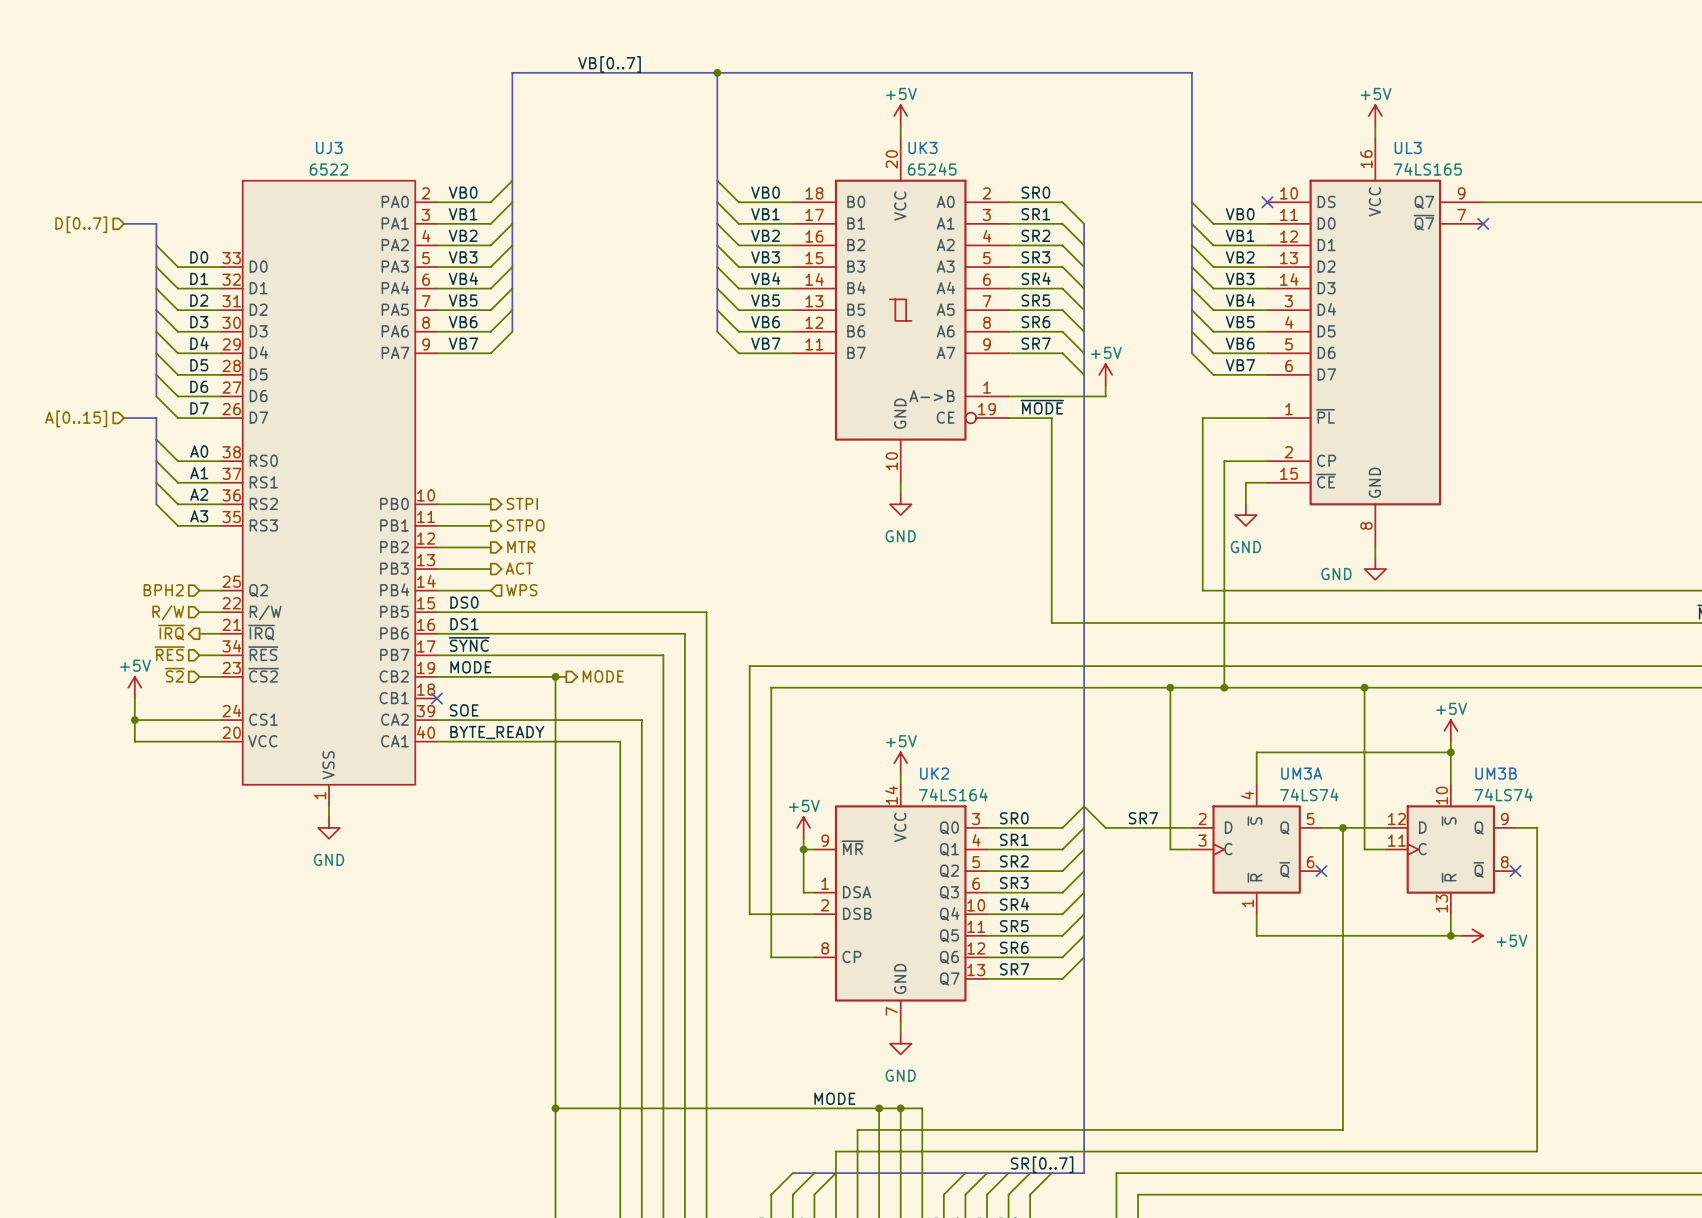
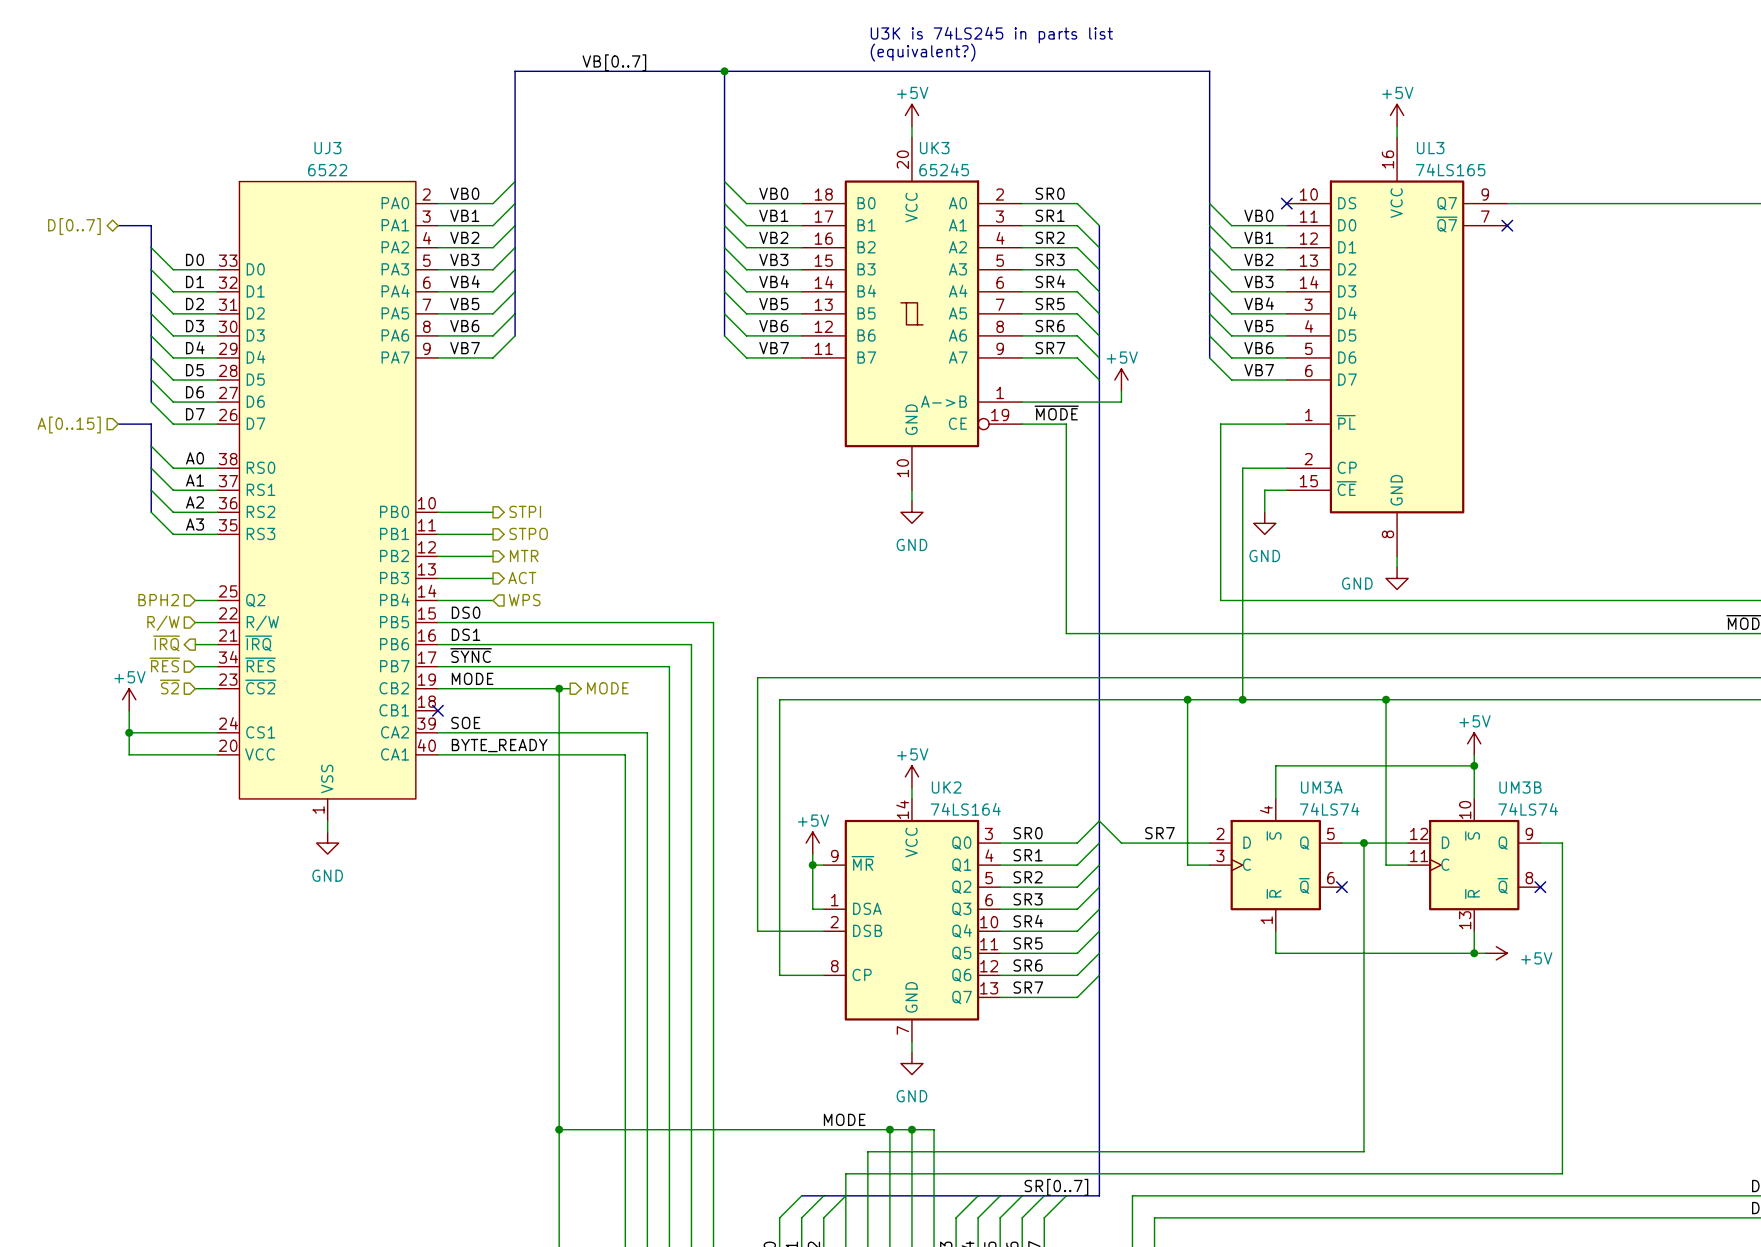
text: none -> U3K is 74LS245 in parts list (991, 35)
text: none -> (equivalent?) (923, 52)
hierarchical label shape: input (81, 224) -> bidirectional (74, 226)

